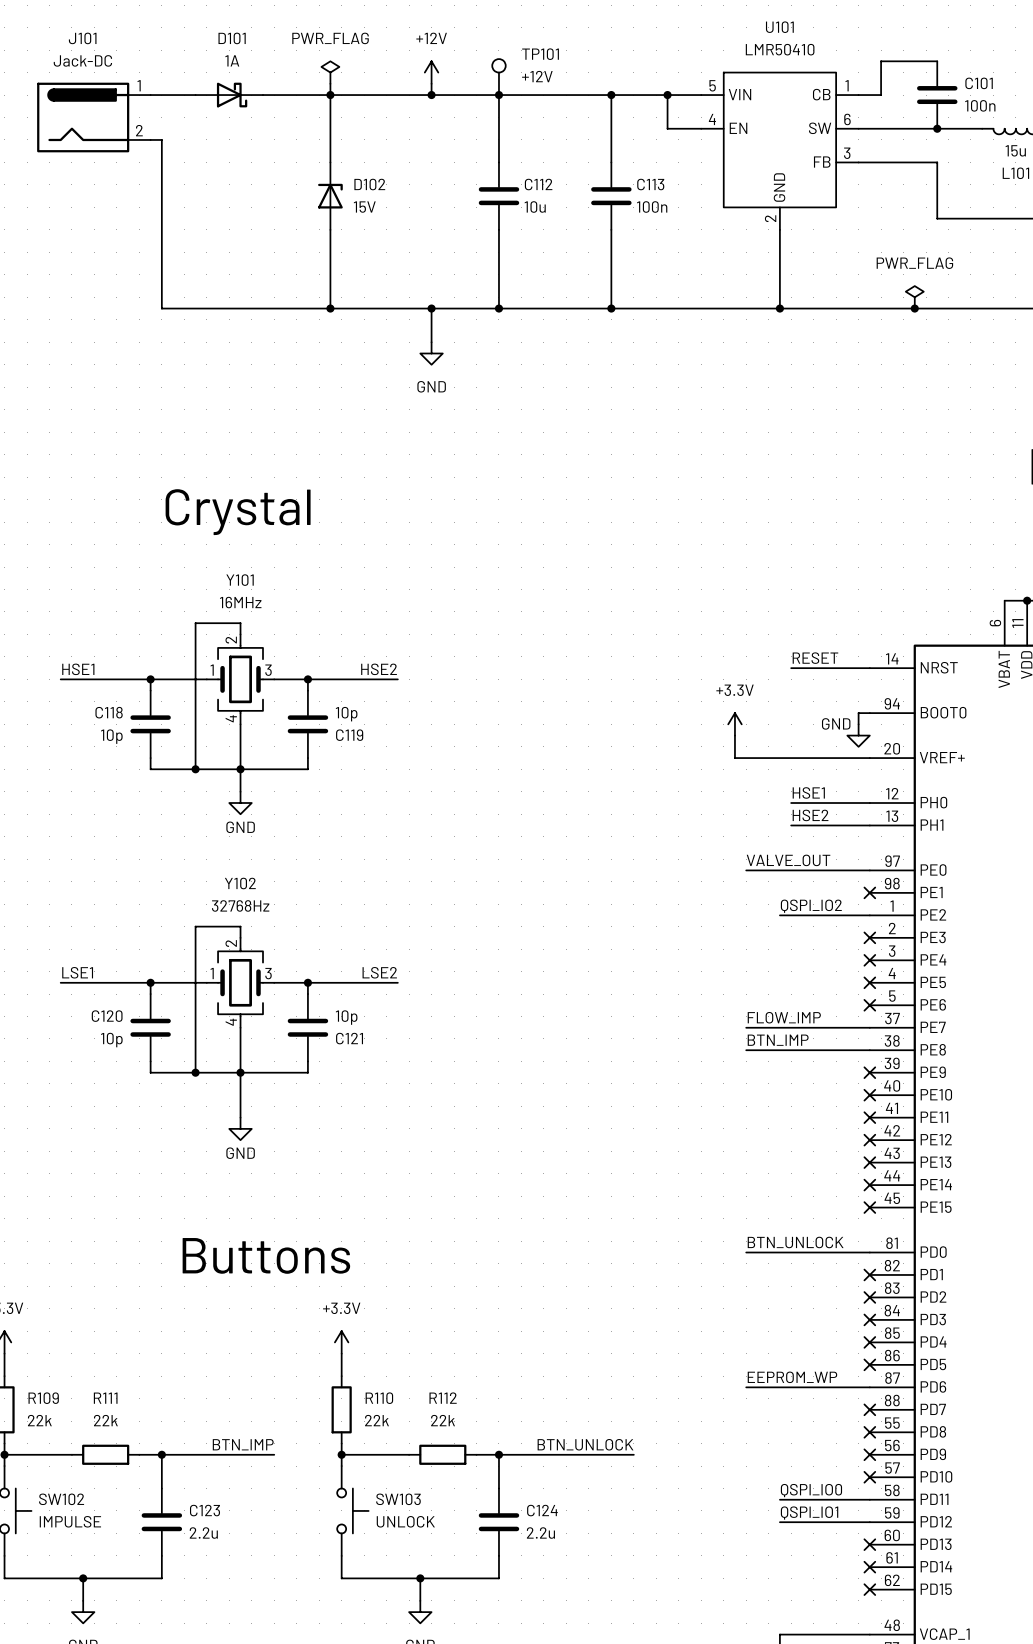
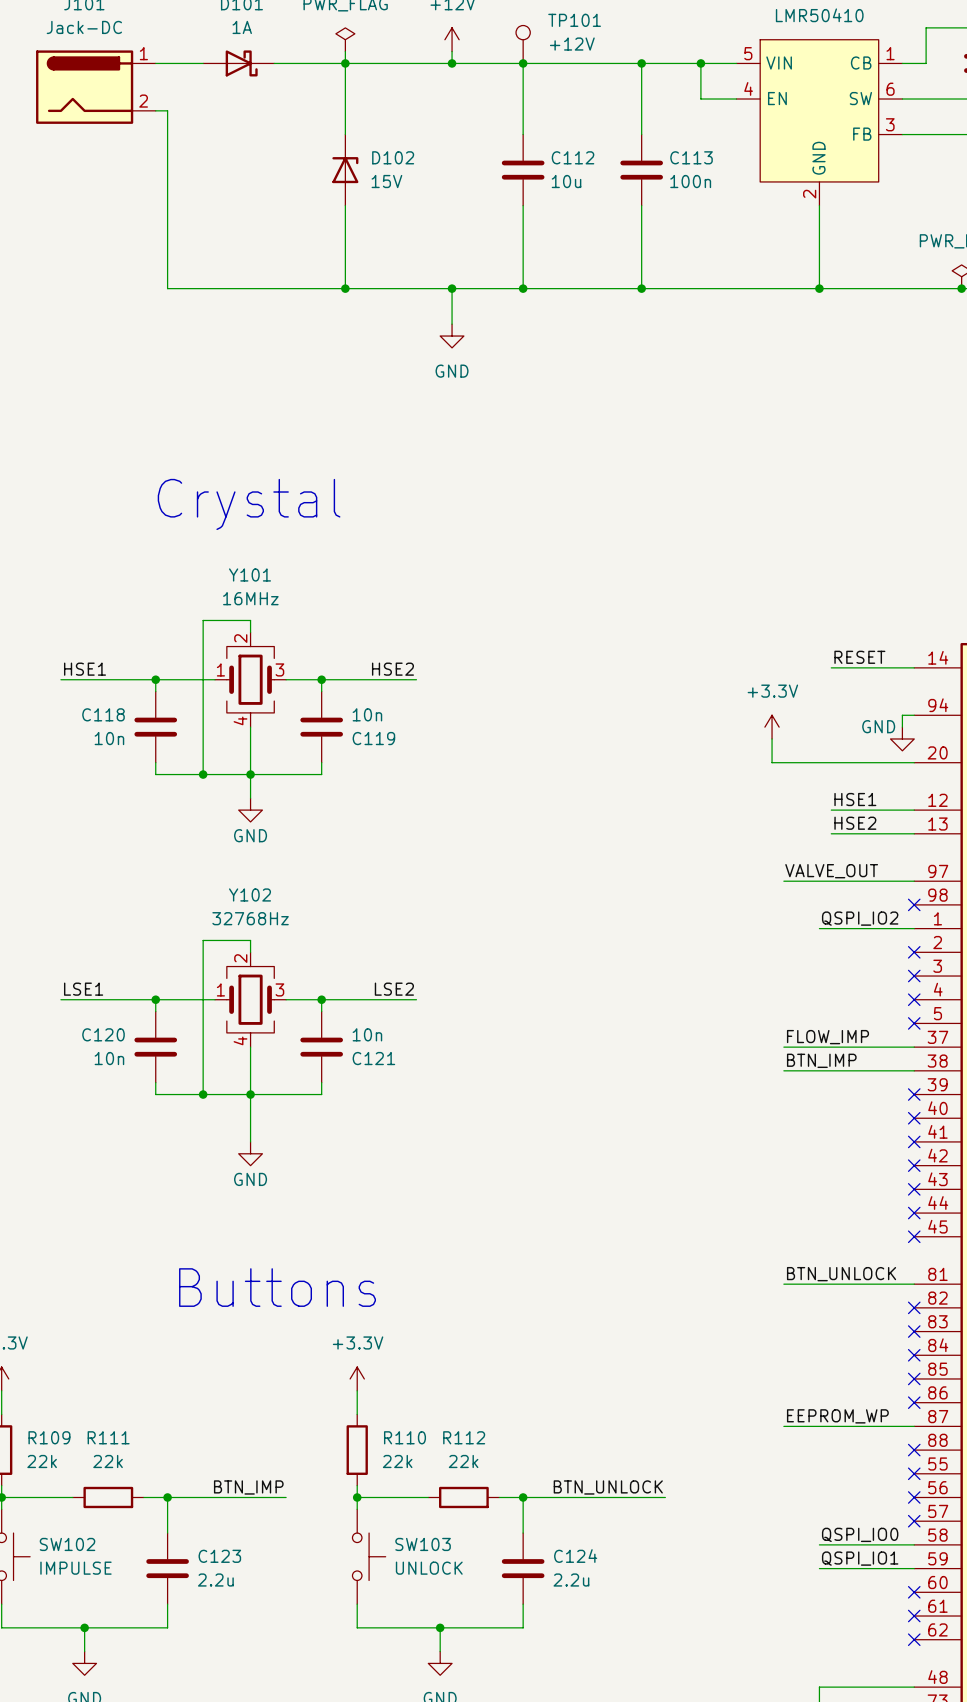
C119 value: 10p (346, 714) -> 10n (367, 714)
C118 value: 10p (111, 736) -> 10n (109, 738)
C121 value: 10p (346, 1017) -> 10n (367, 1034)
C120 value: 10p (111, 1040) -> 10n (109, 1058)

